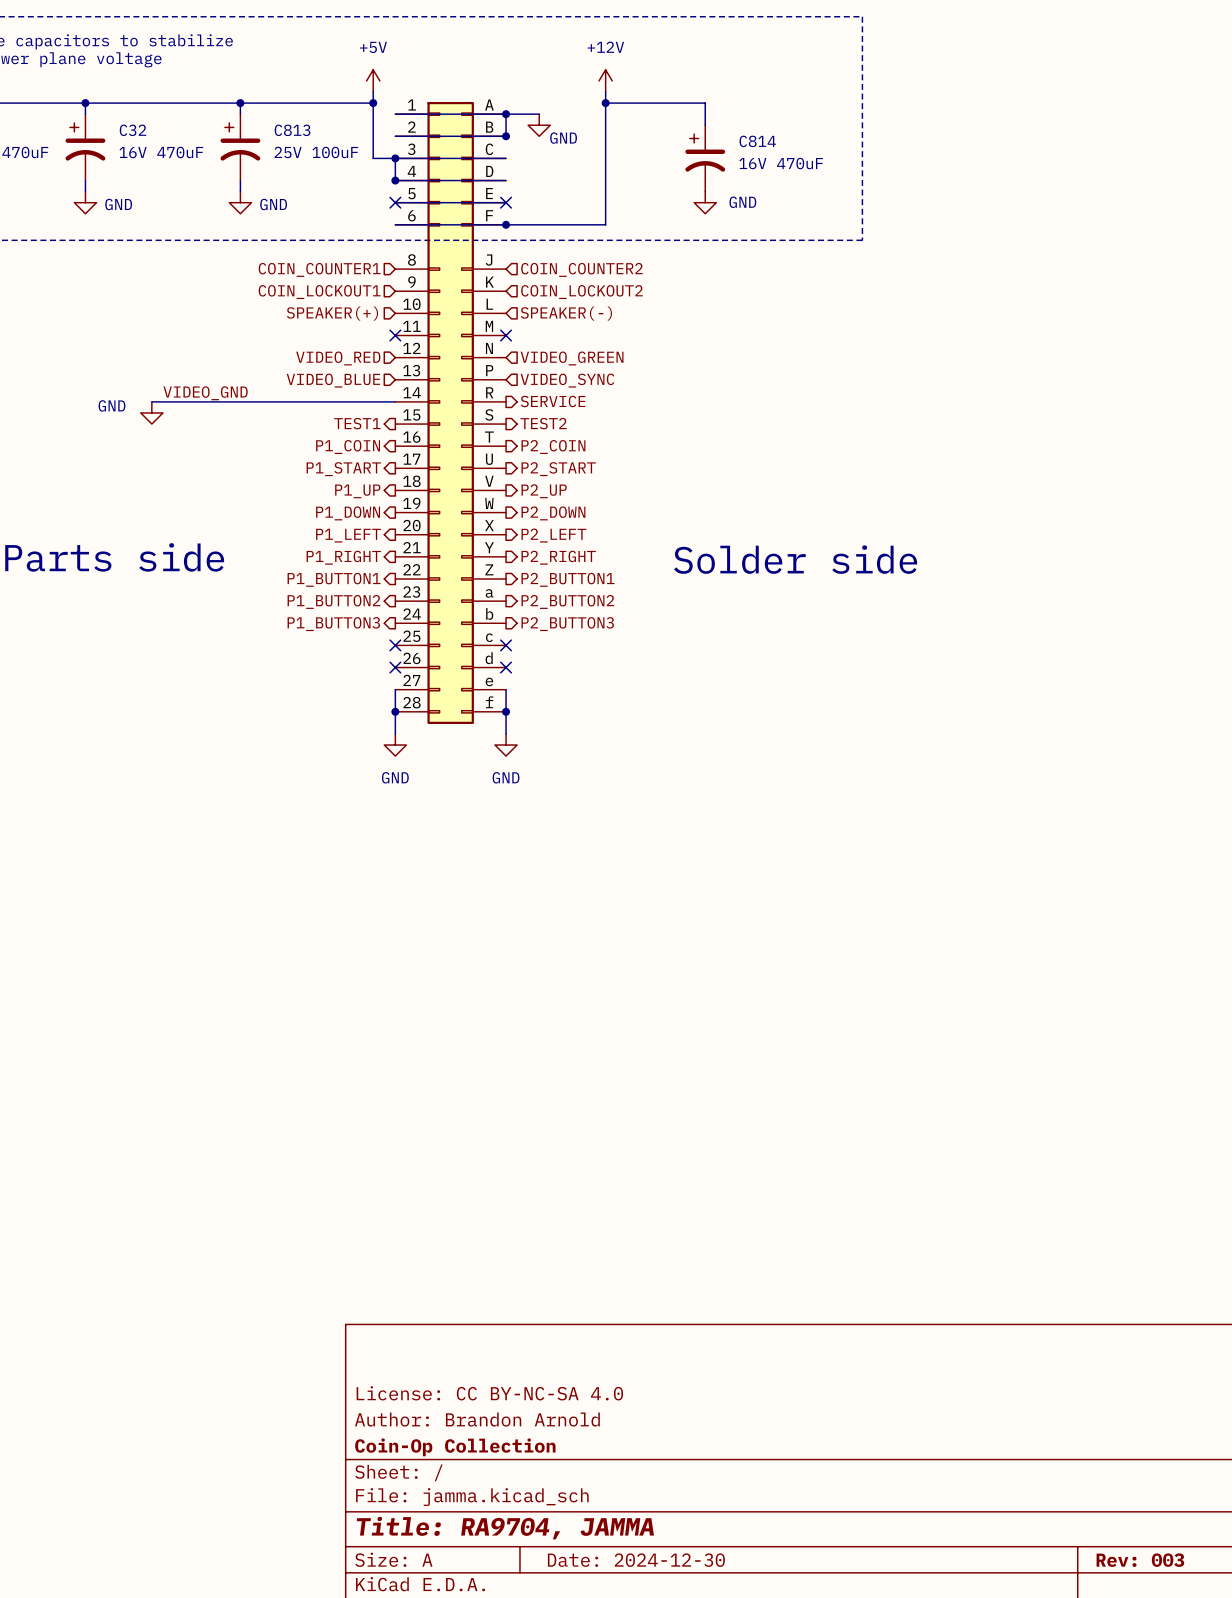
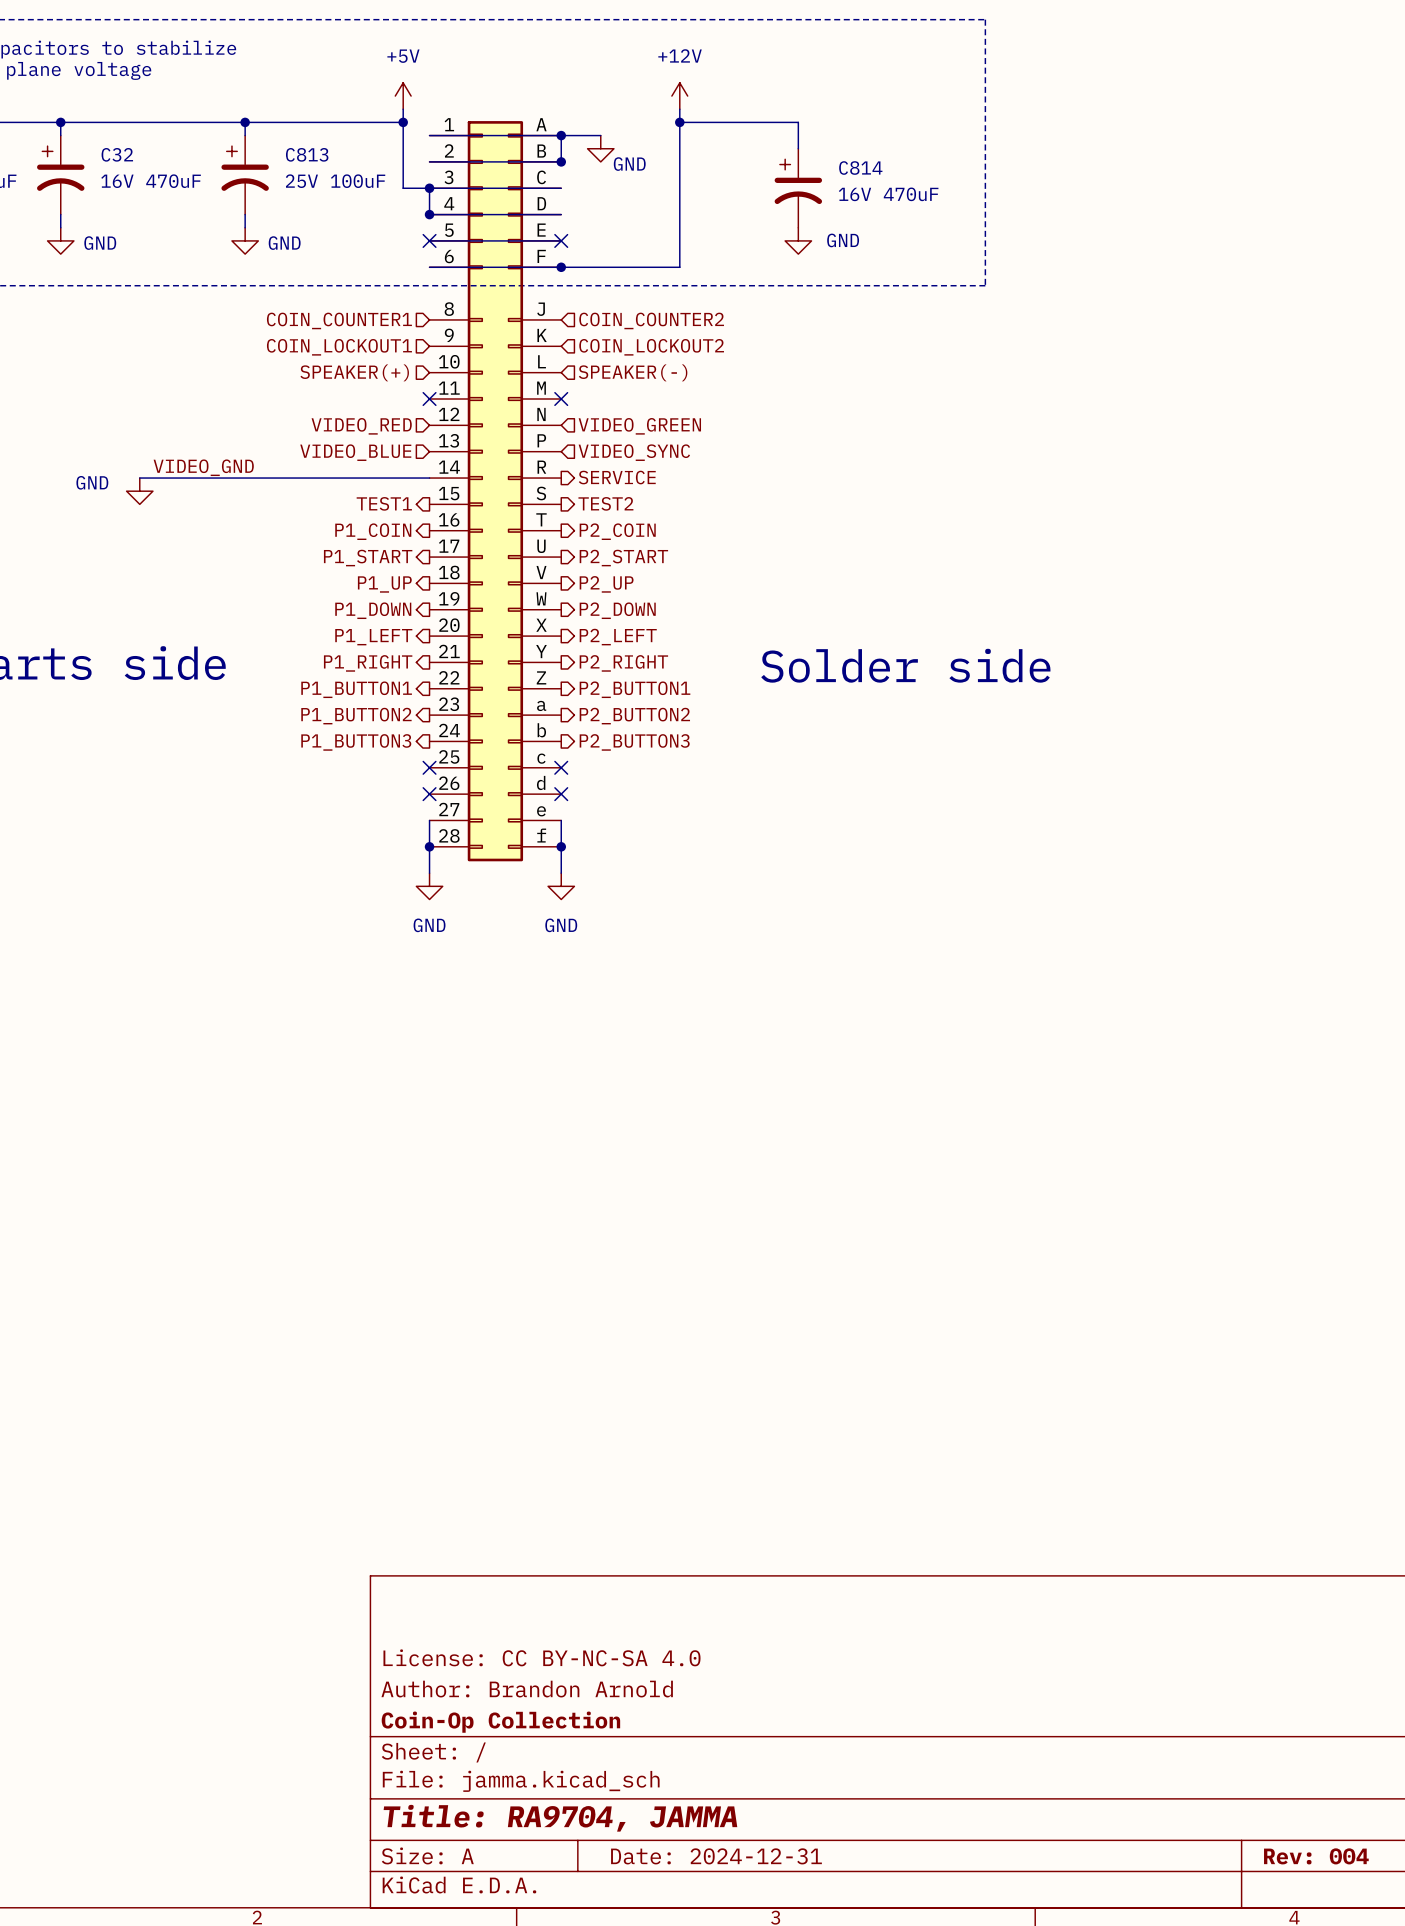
title block: Date: 2024-12-30 (636, 1560) -> Date: 2024-12-31 (716, 1856)
title block: Rev: 003 (1140, 1560) -> Rev: 004 (1316, 1856)

